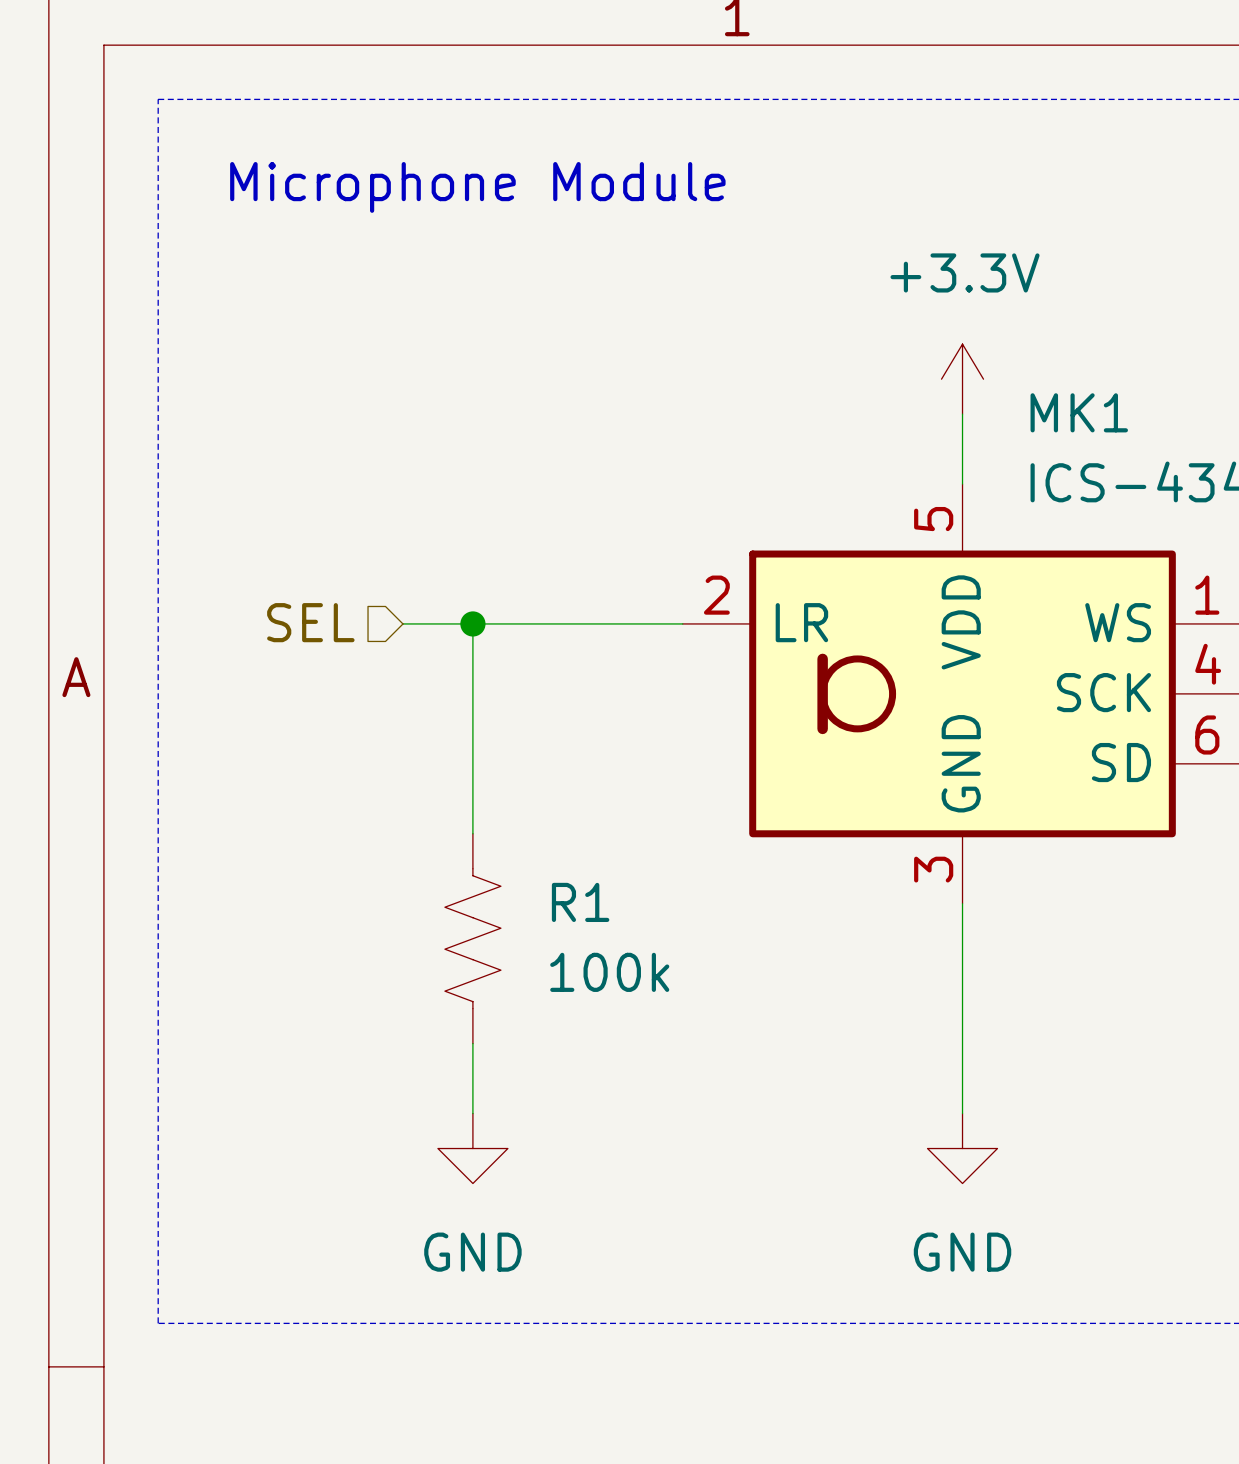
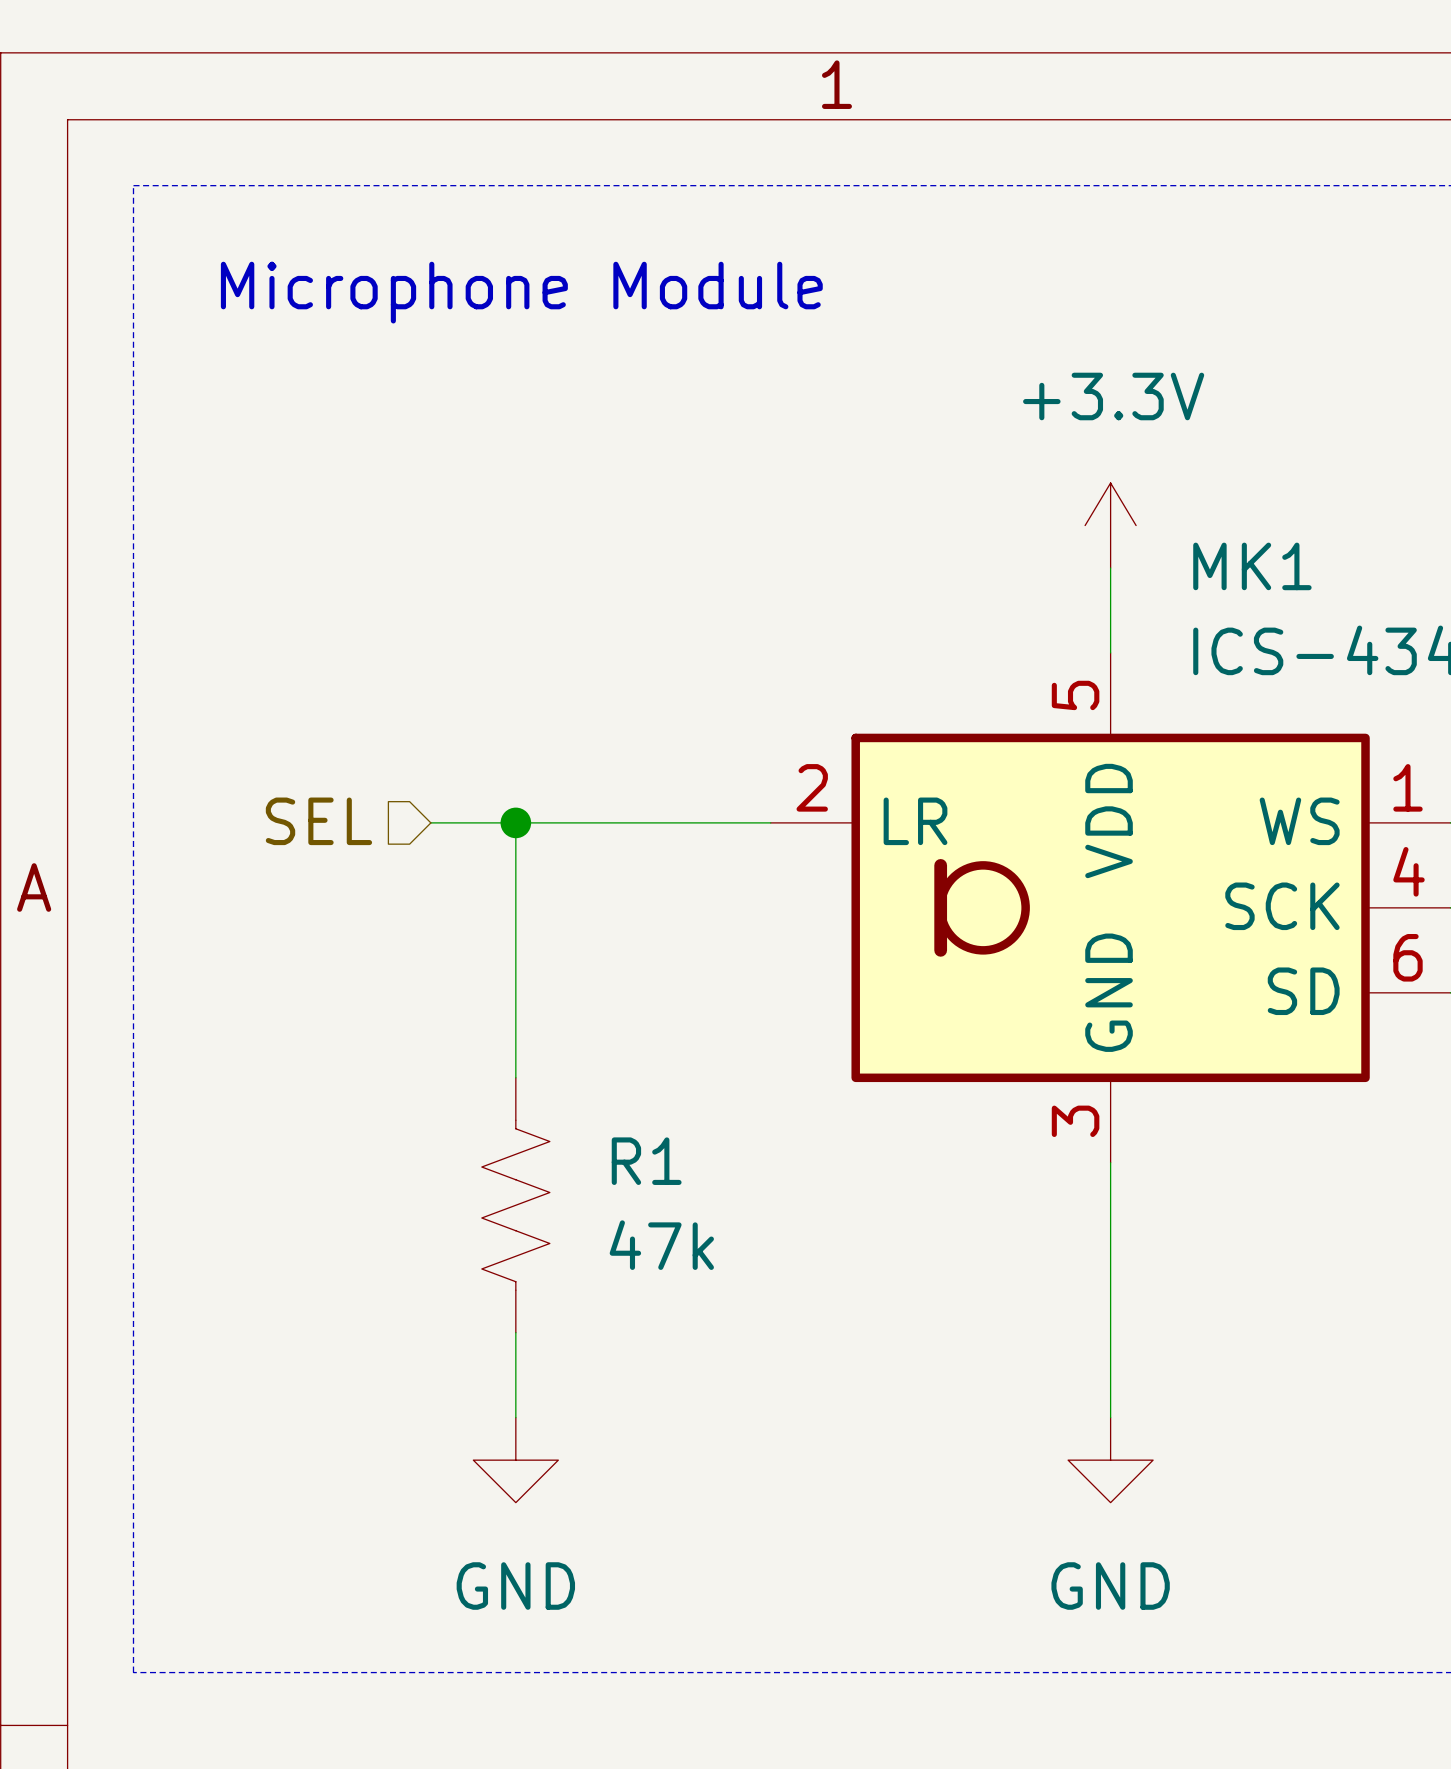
R1 value: 100k (609, 972) -> 47k (661, 1245)

